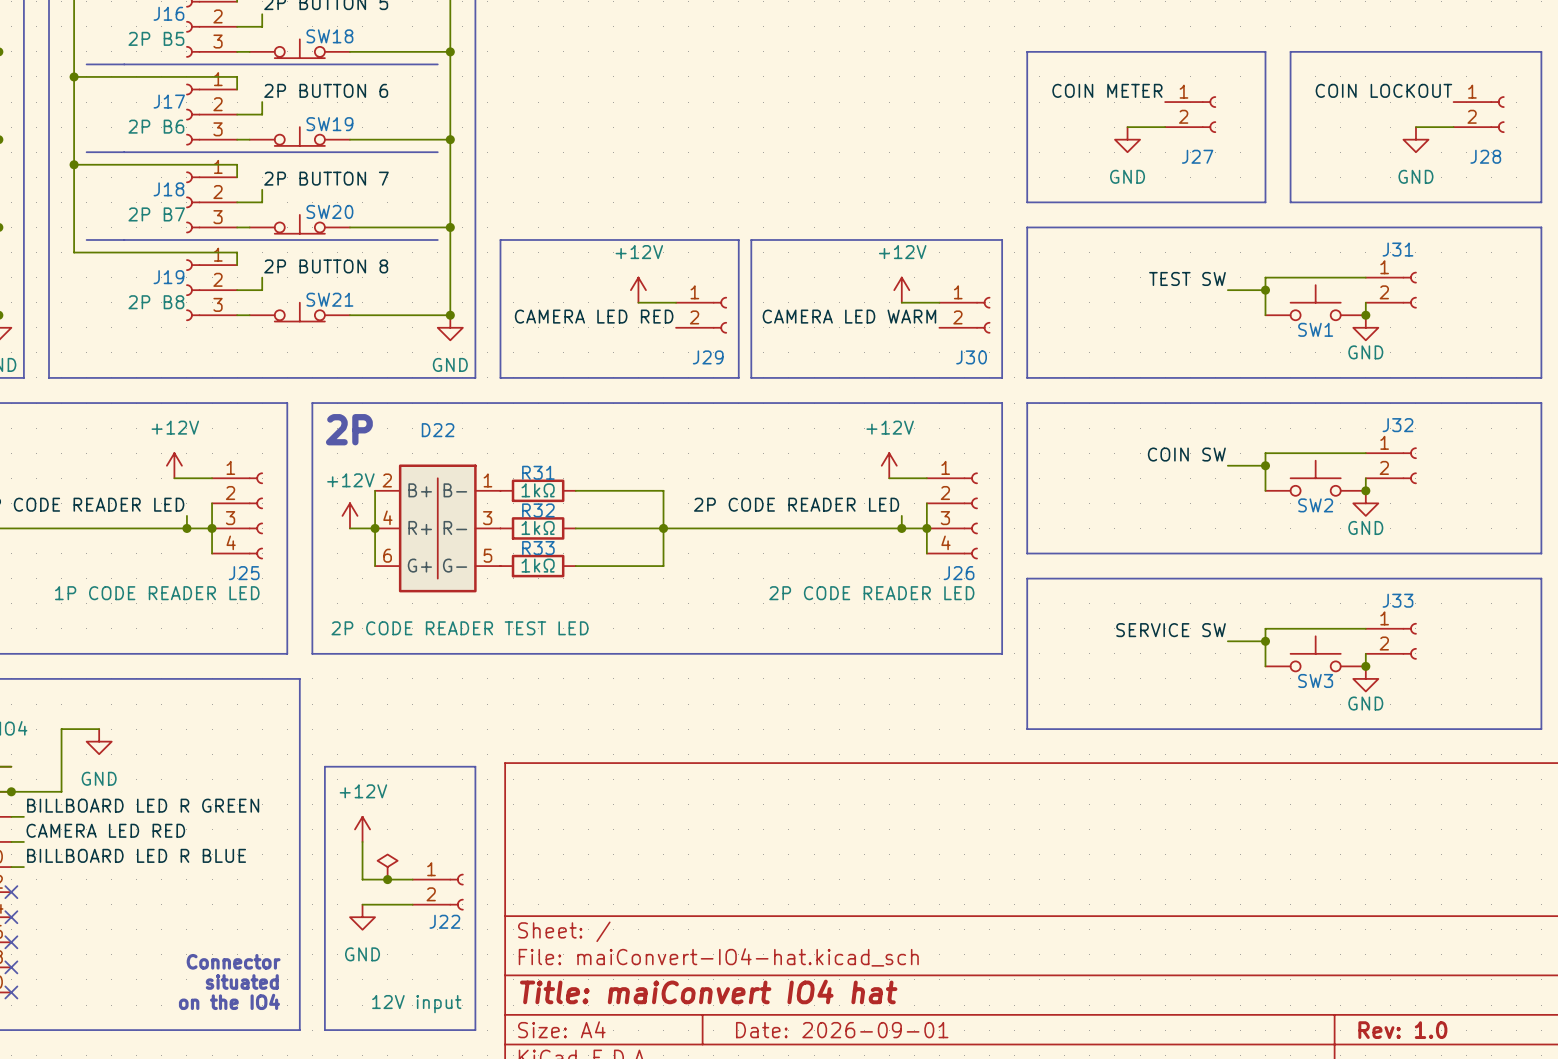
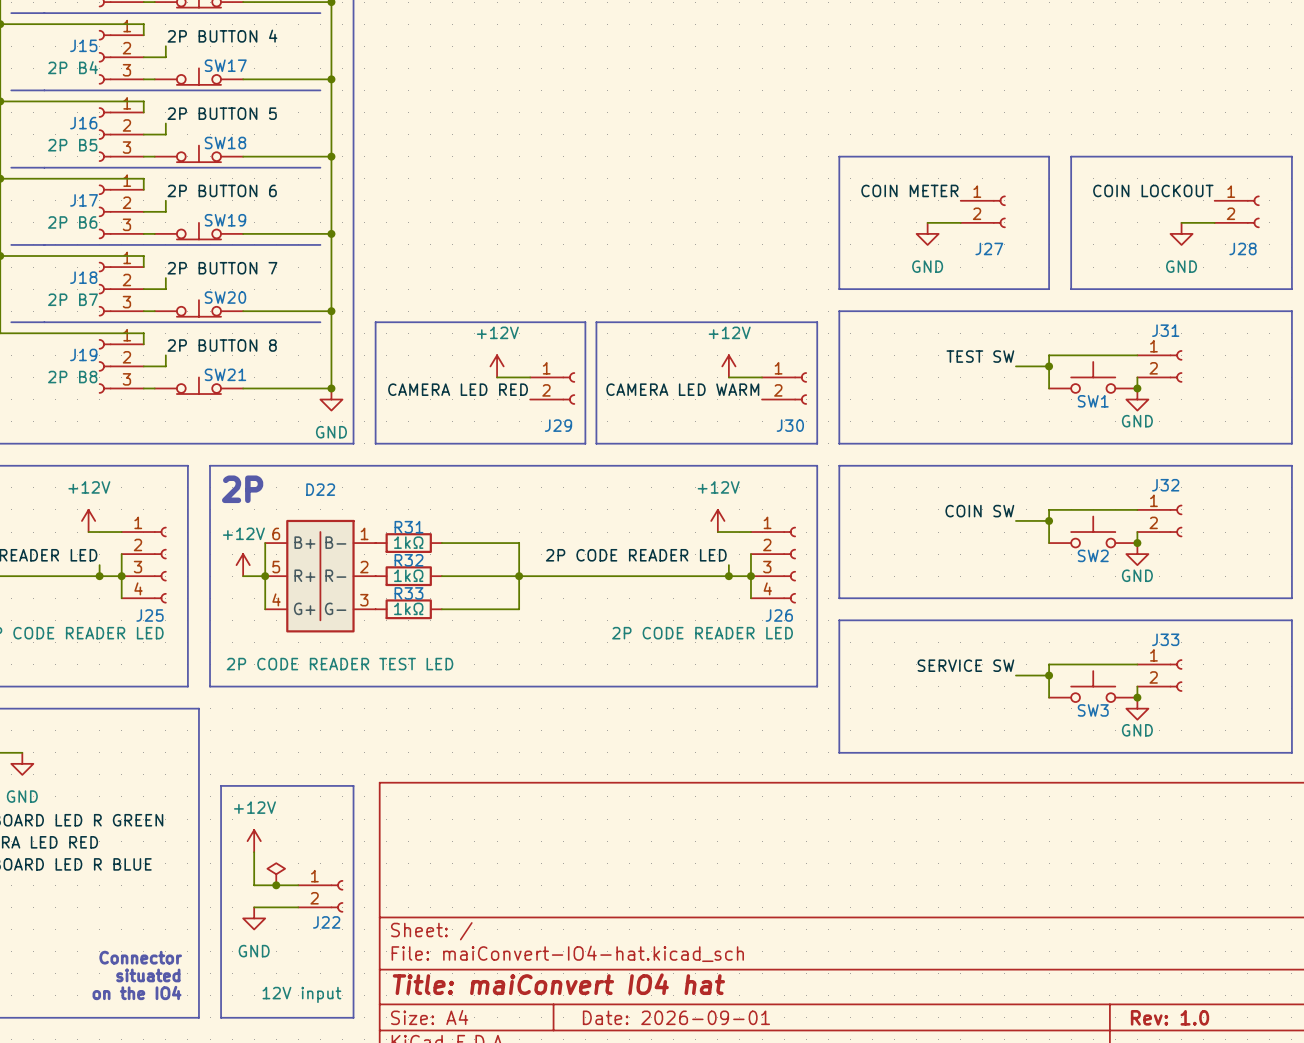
D22 pin number: 2 (387, 480) -> 6 (276, 533)
D22 pin number: 4 (387, 517) -> 5 (276, 567)
D22 pin number: 3 (487, 518) -> 2 (364, 567)
D22 pin number: 6 (387, 555) -> 4 (276, 599)
D22 pin number: 5 (487, 555) -> 3 (364, 600)

